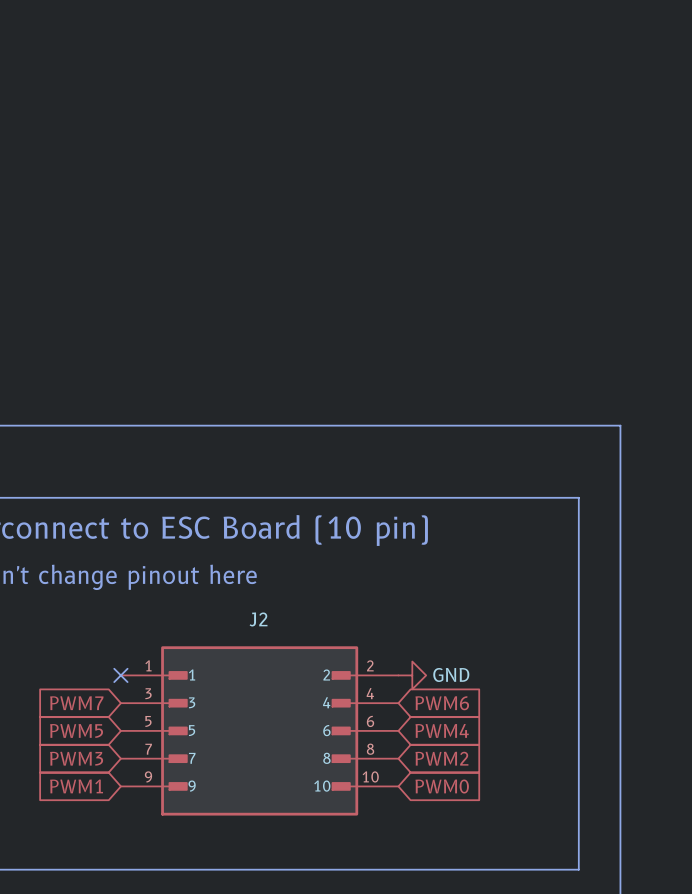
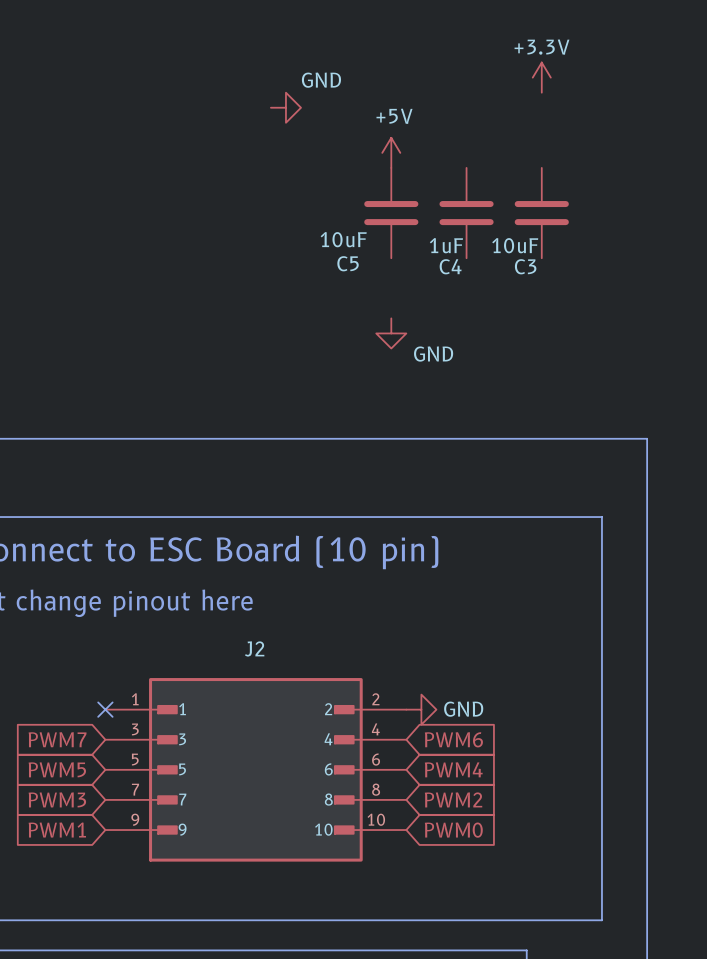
power symbol: none -> +3.3V (541, 77)
power symbol: none -> GND (285, 107)
power symbol: none -> +5V (391, 152)
C5: none -> 10uF (391, 213)
C4: none -> 1uF (466, 213)
C3: none -> 10uF (541, 213)
power symbol: none -> GND (391, 333)

